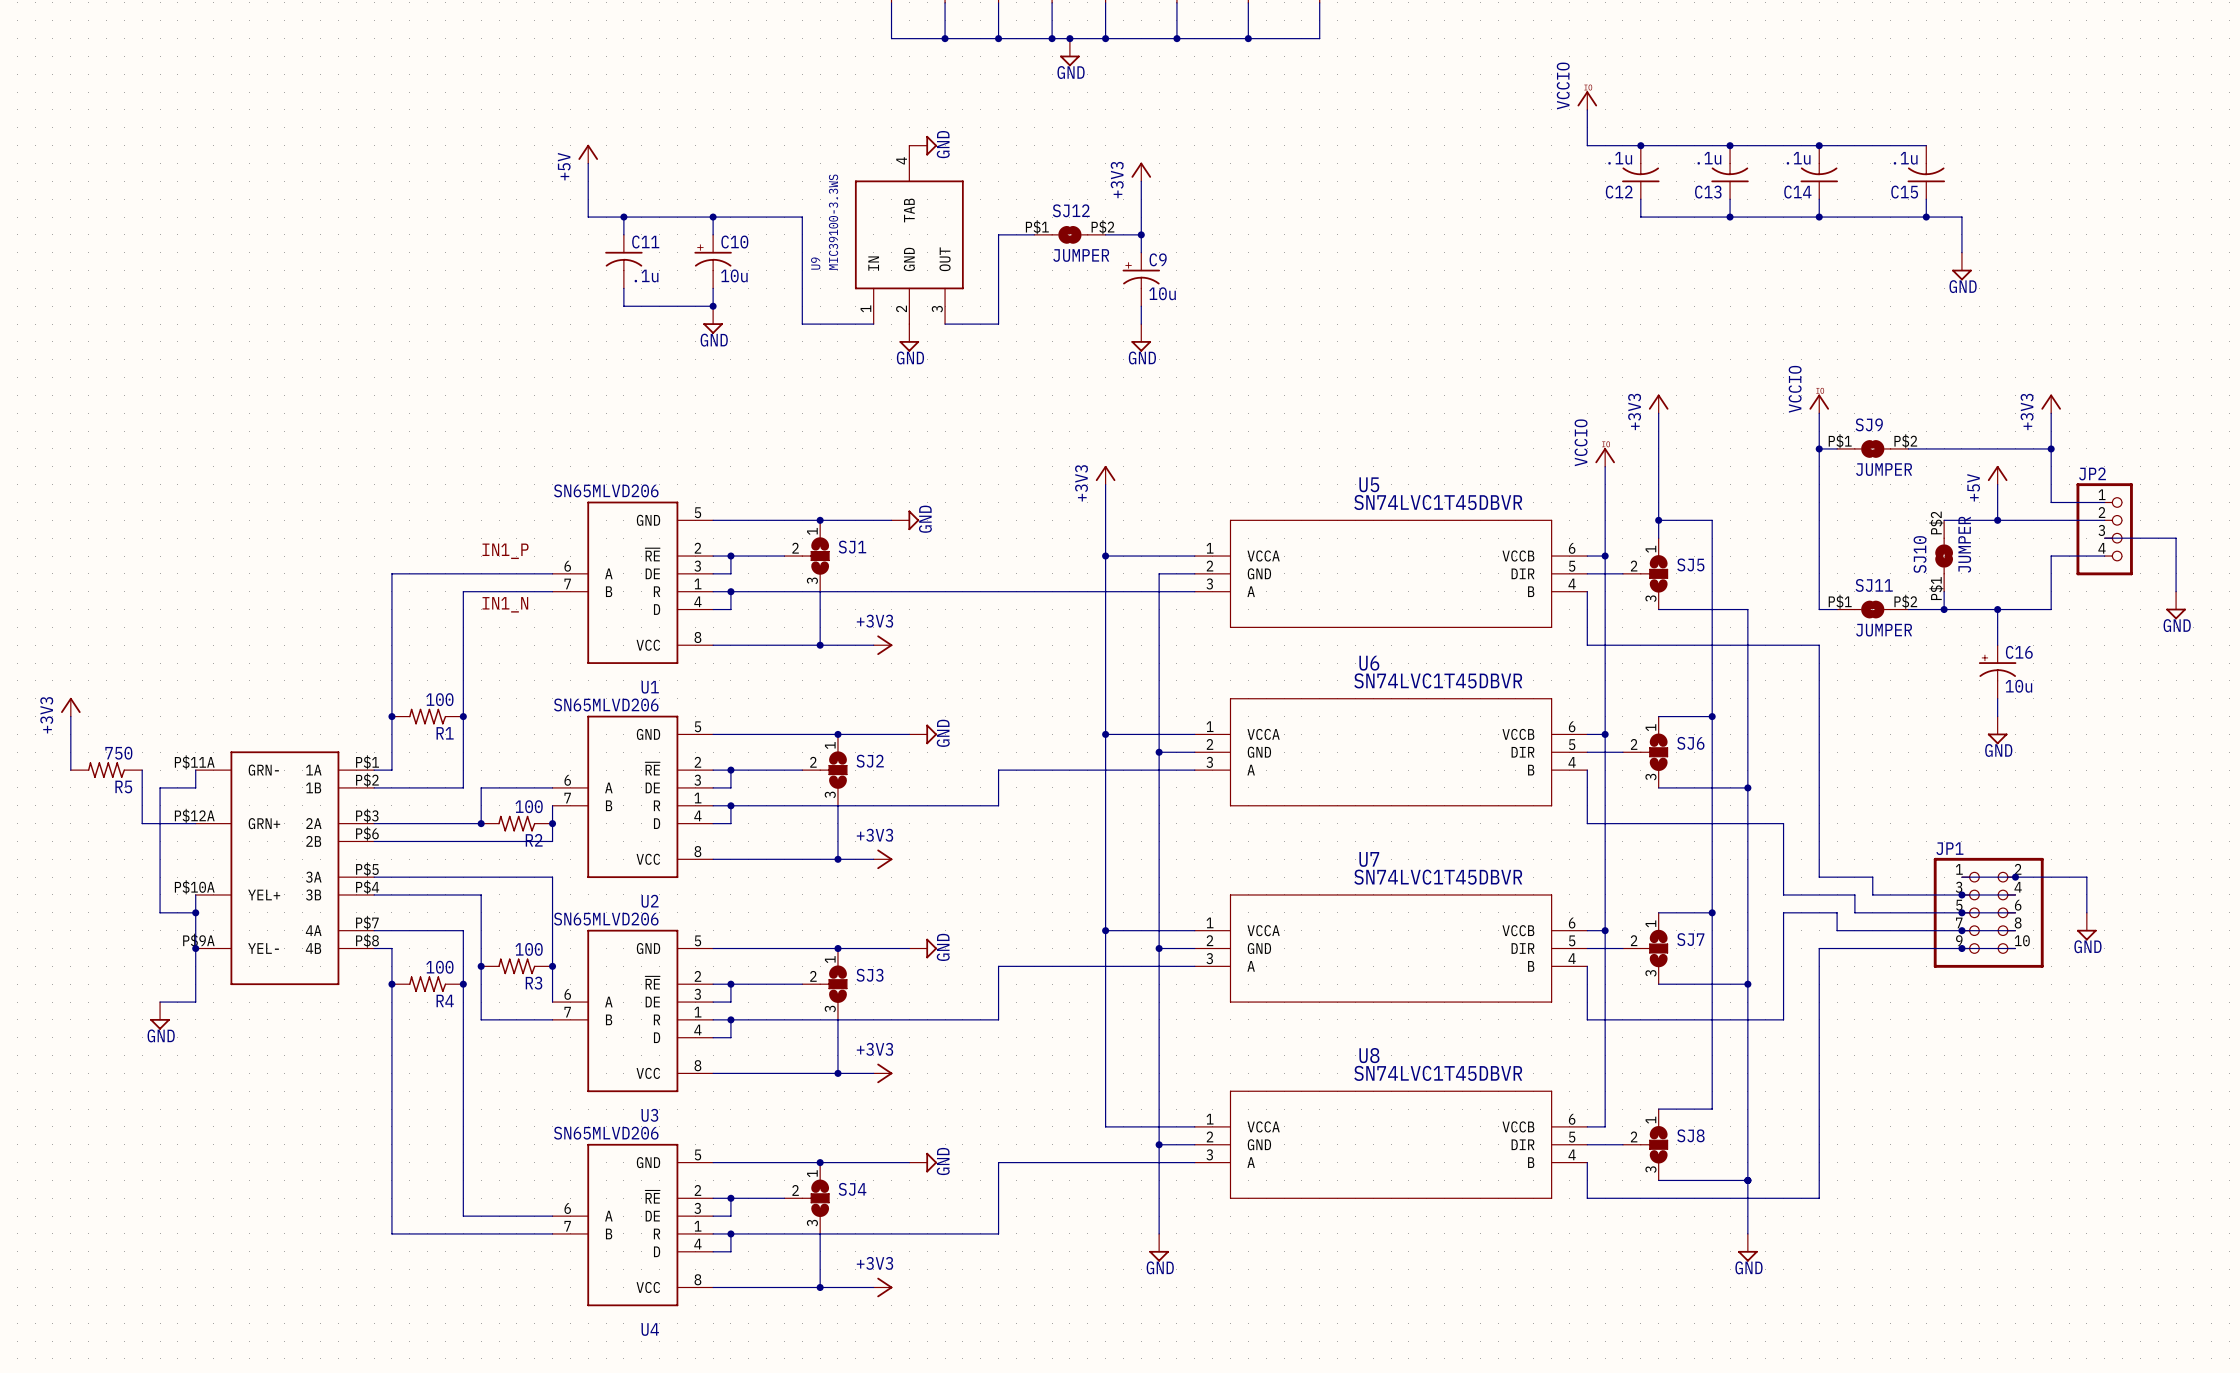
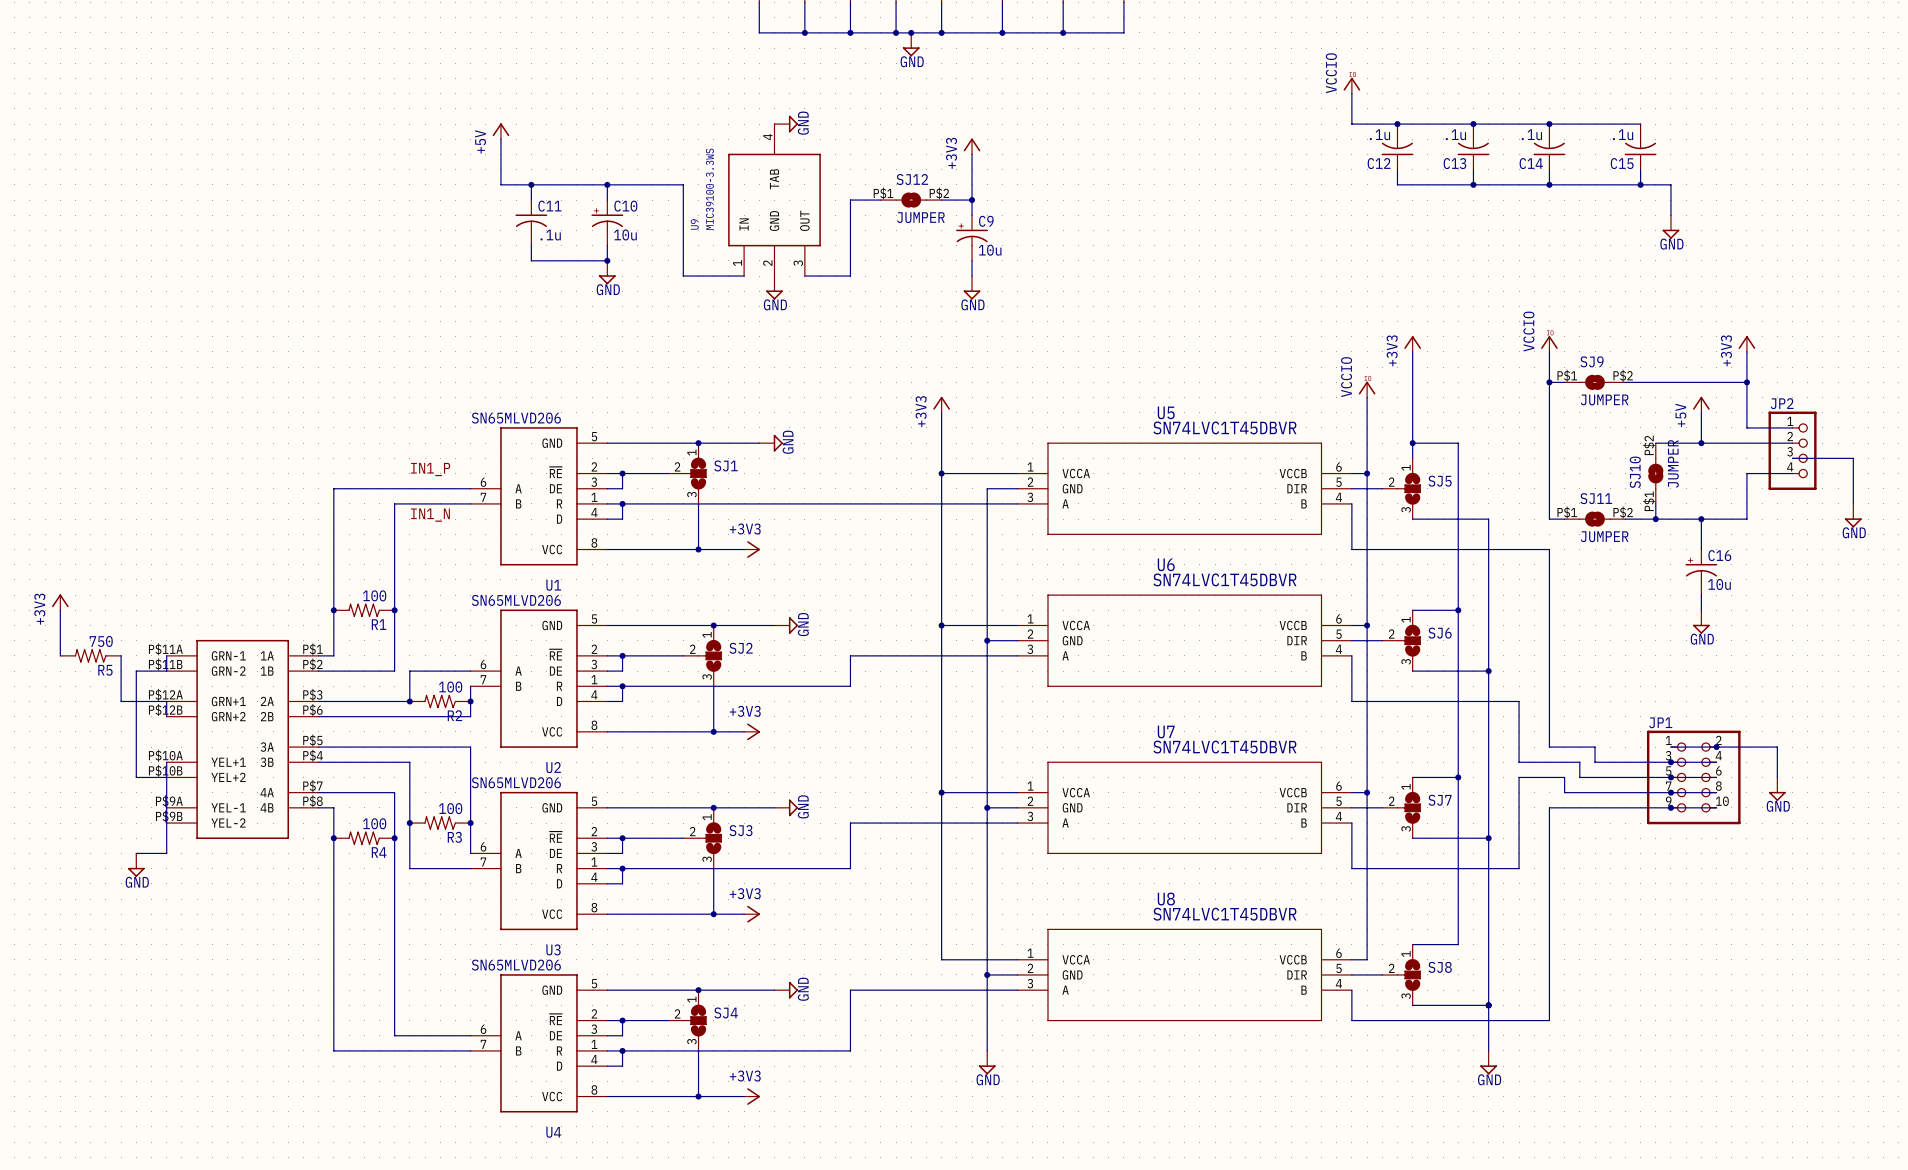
part symbol: [195, 751, 375, 986] -> [166, 639, 319, 839]
wire: none -> (166, 701) (166, 716)
junction: (195, 912) -> none
junction: (195, 948) -> none

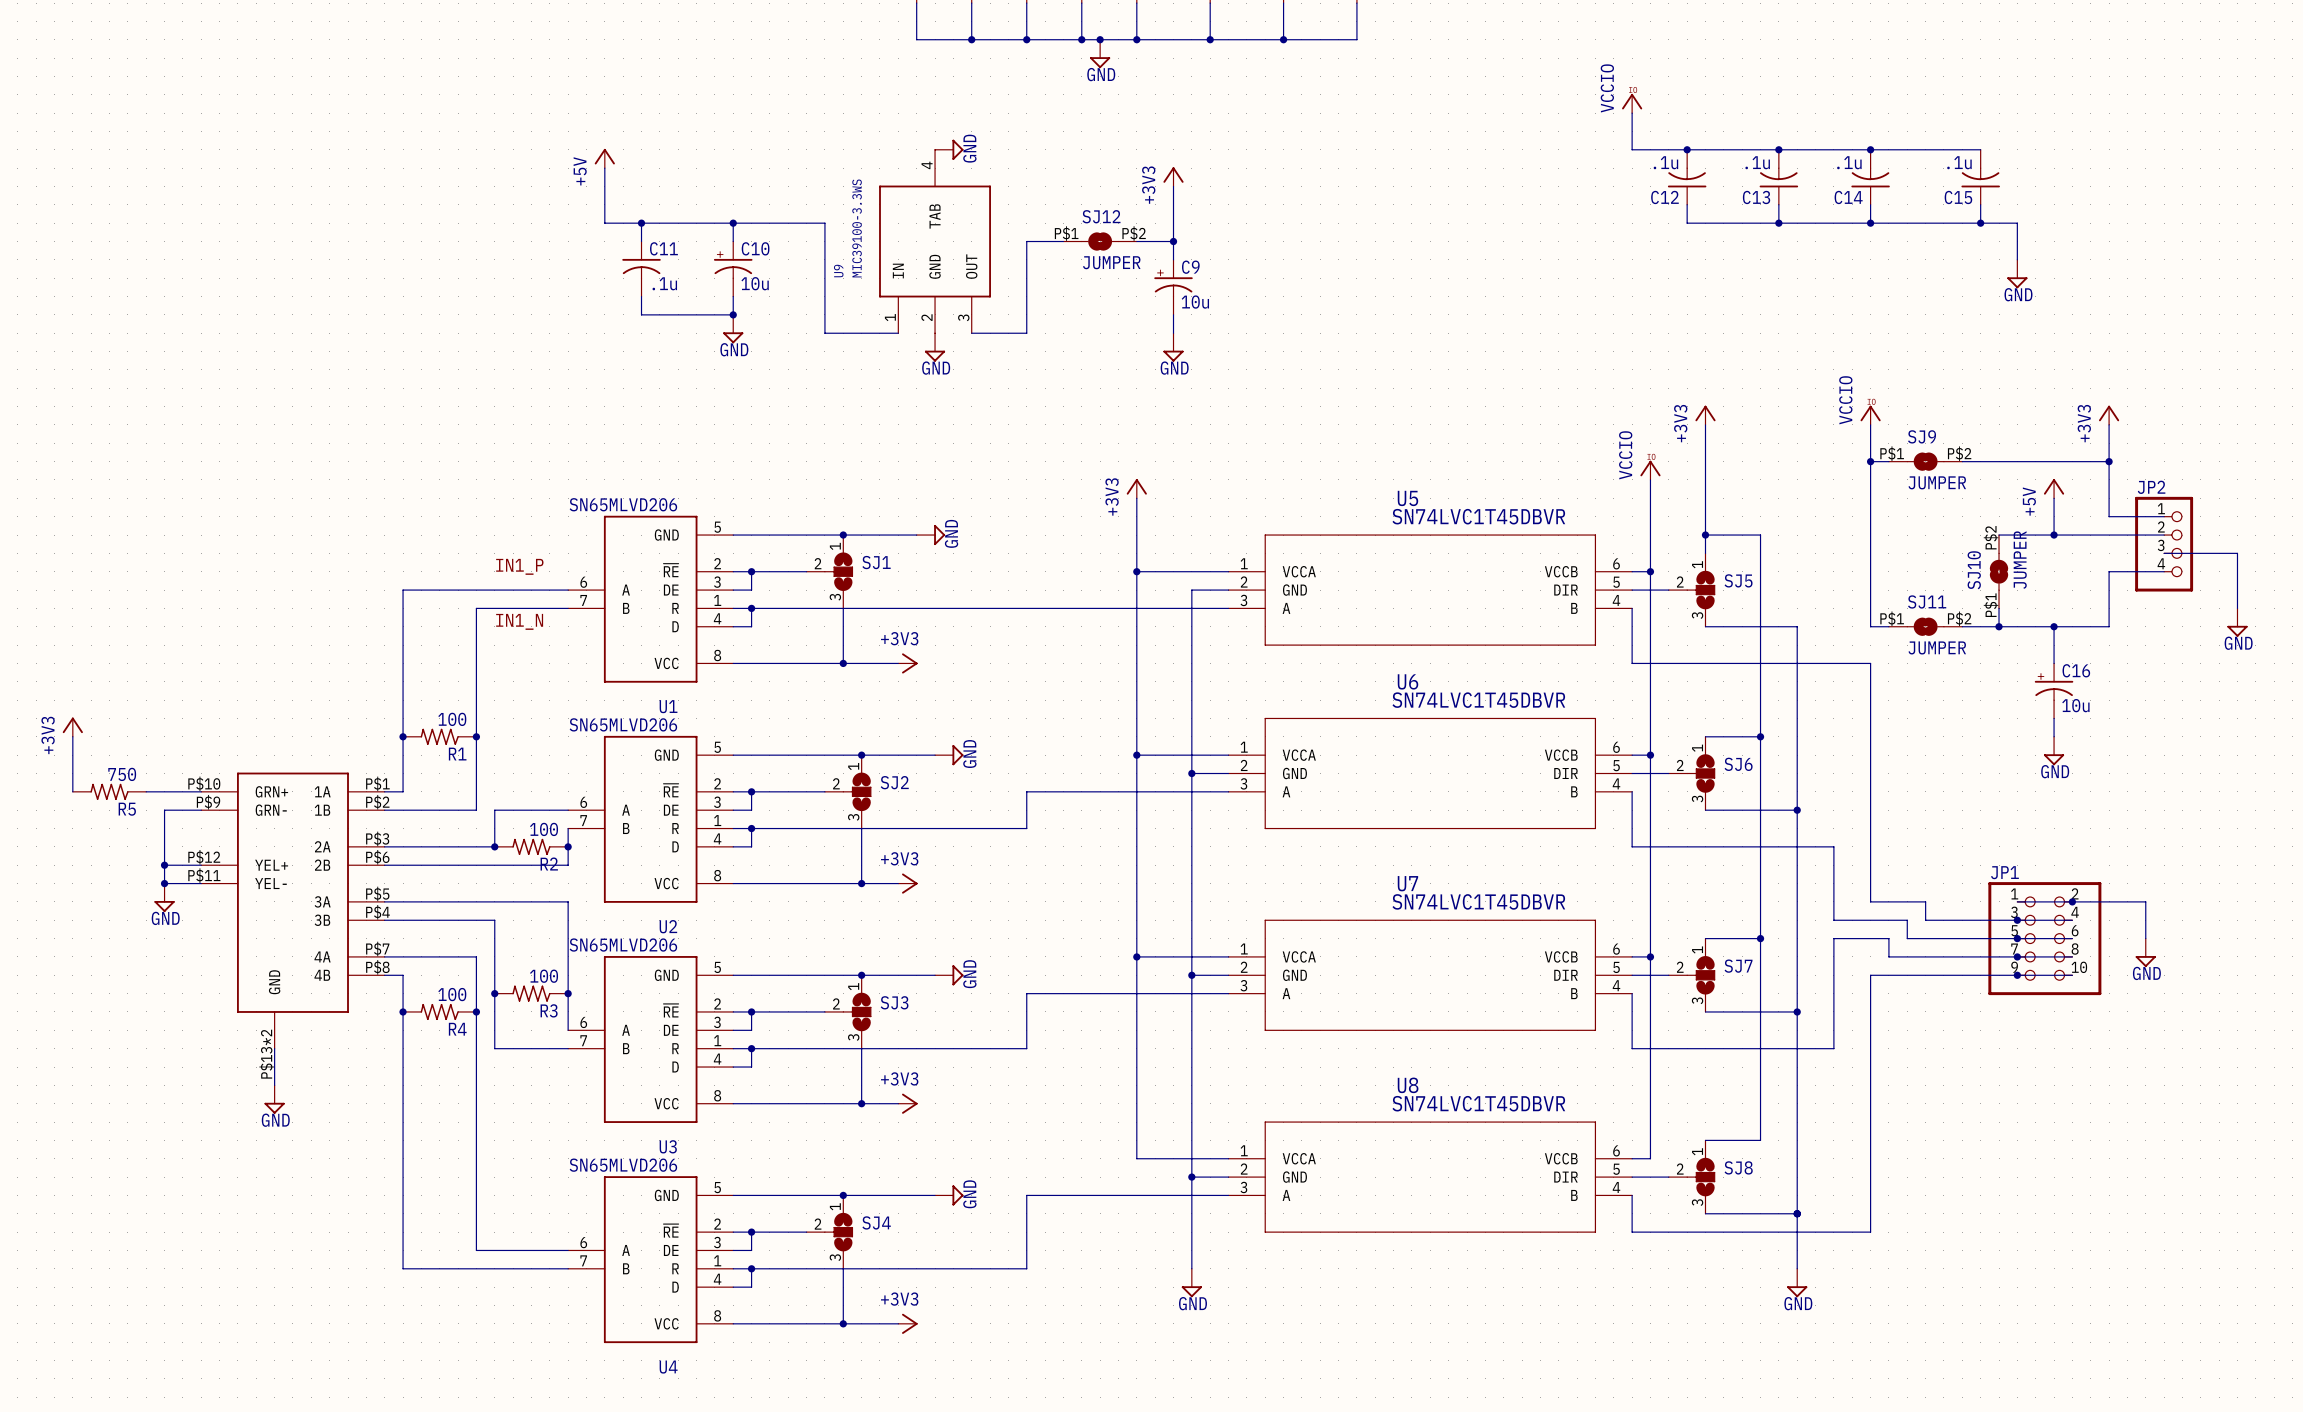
wire: (121, 655) (121, 701) (166, 701) (166, 716) -> (164, 865) (201, 865)
wire: (166, 655) (166, 671) -> (201, 791) (146, 791)
junction: none -> (164, 865)
wire: (136, 731) (136, 777) (166, 777) -> (164, 883) (201, 883)
junction: none -> (164, 883)
part: (242, 739) -> none
power symbol: none -> GND (164, 897)
part: none -> (292, 910)
wire: (166, 762) (166, 853) (136, 853) -> none
power symbol: GND (136, 865) -> none
wire: none -> (274, 1048) (274, 1085)
power symbol: none -> GND (274, 1099)

